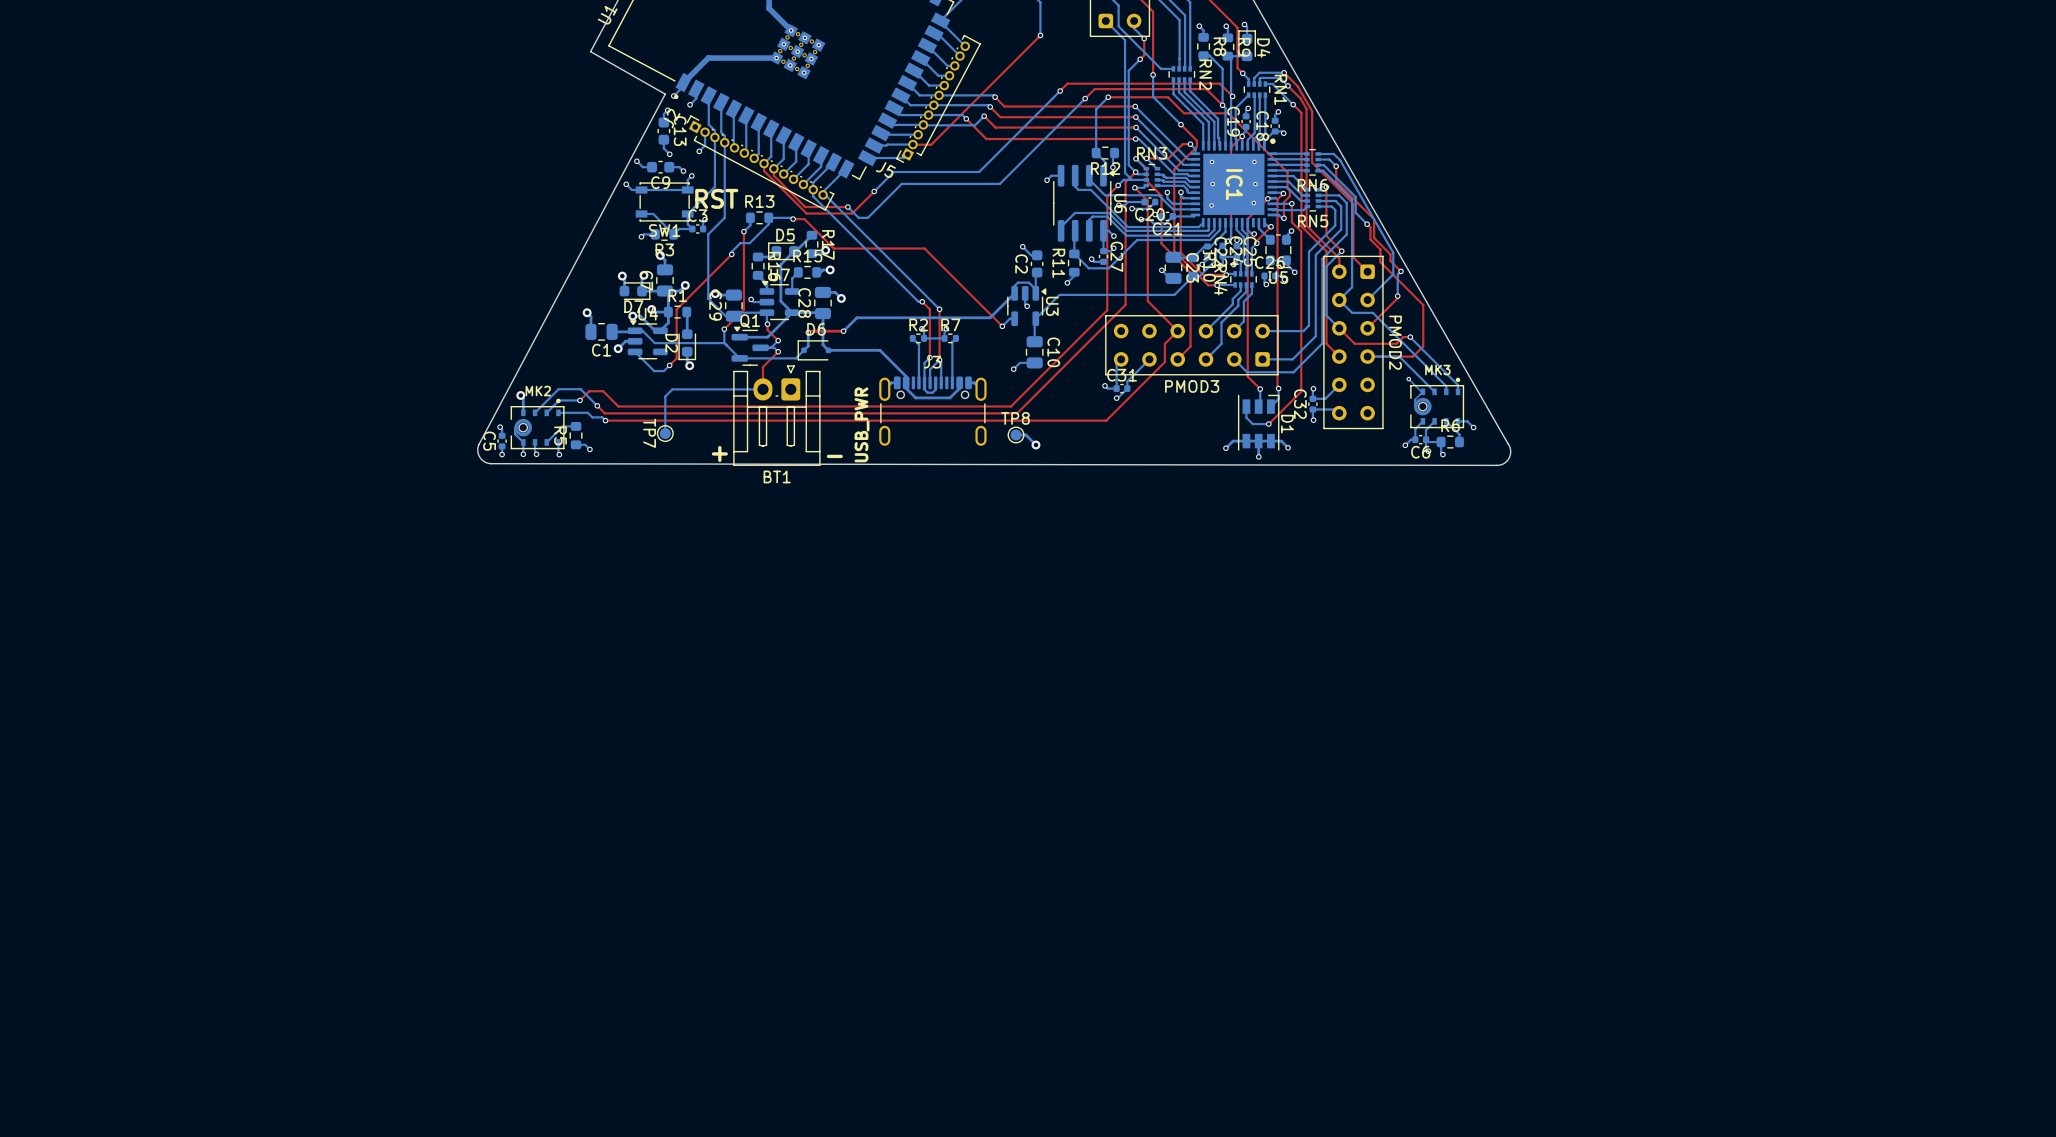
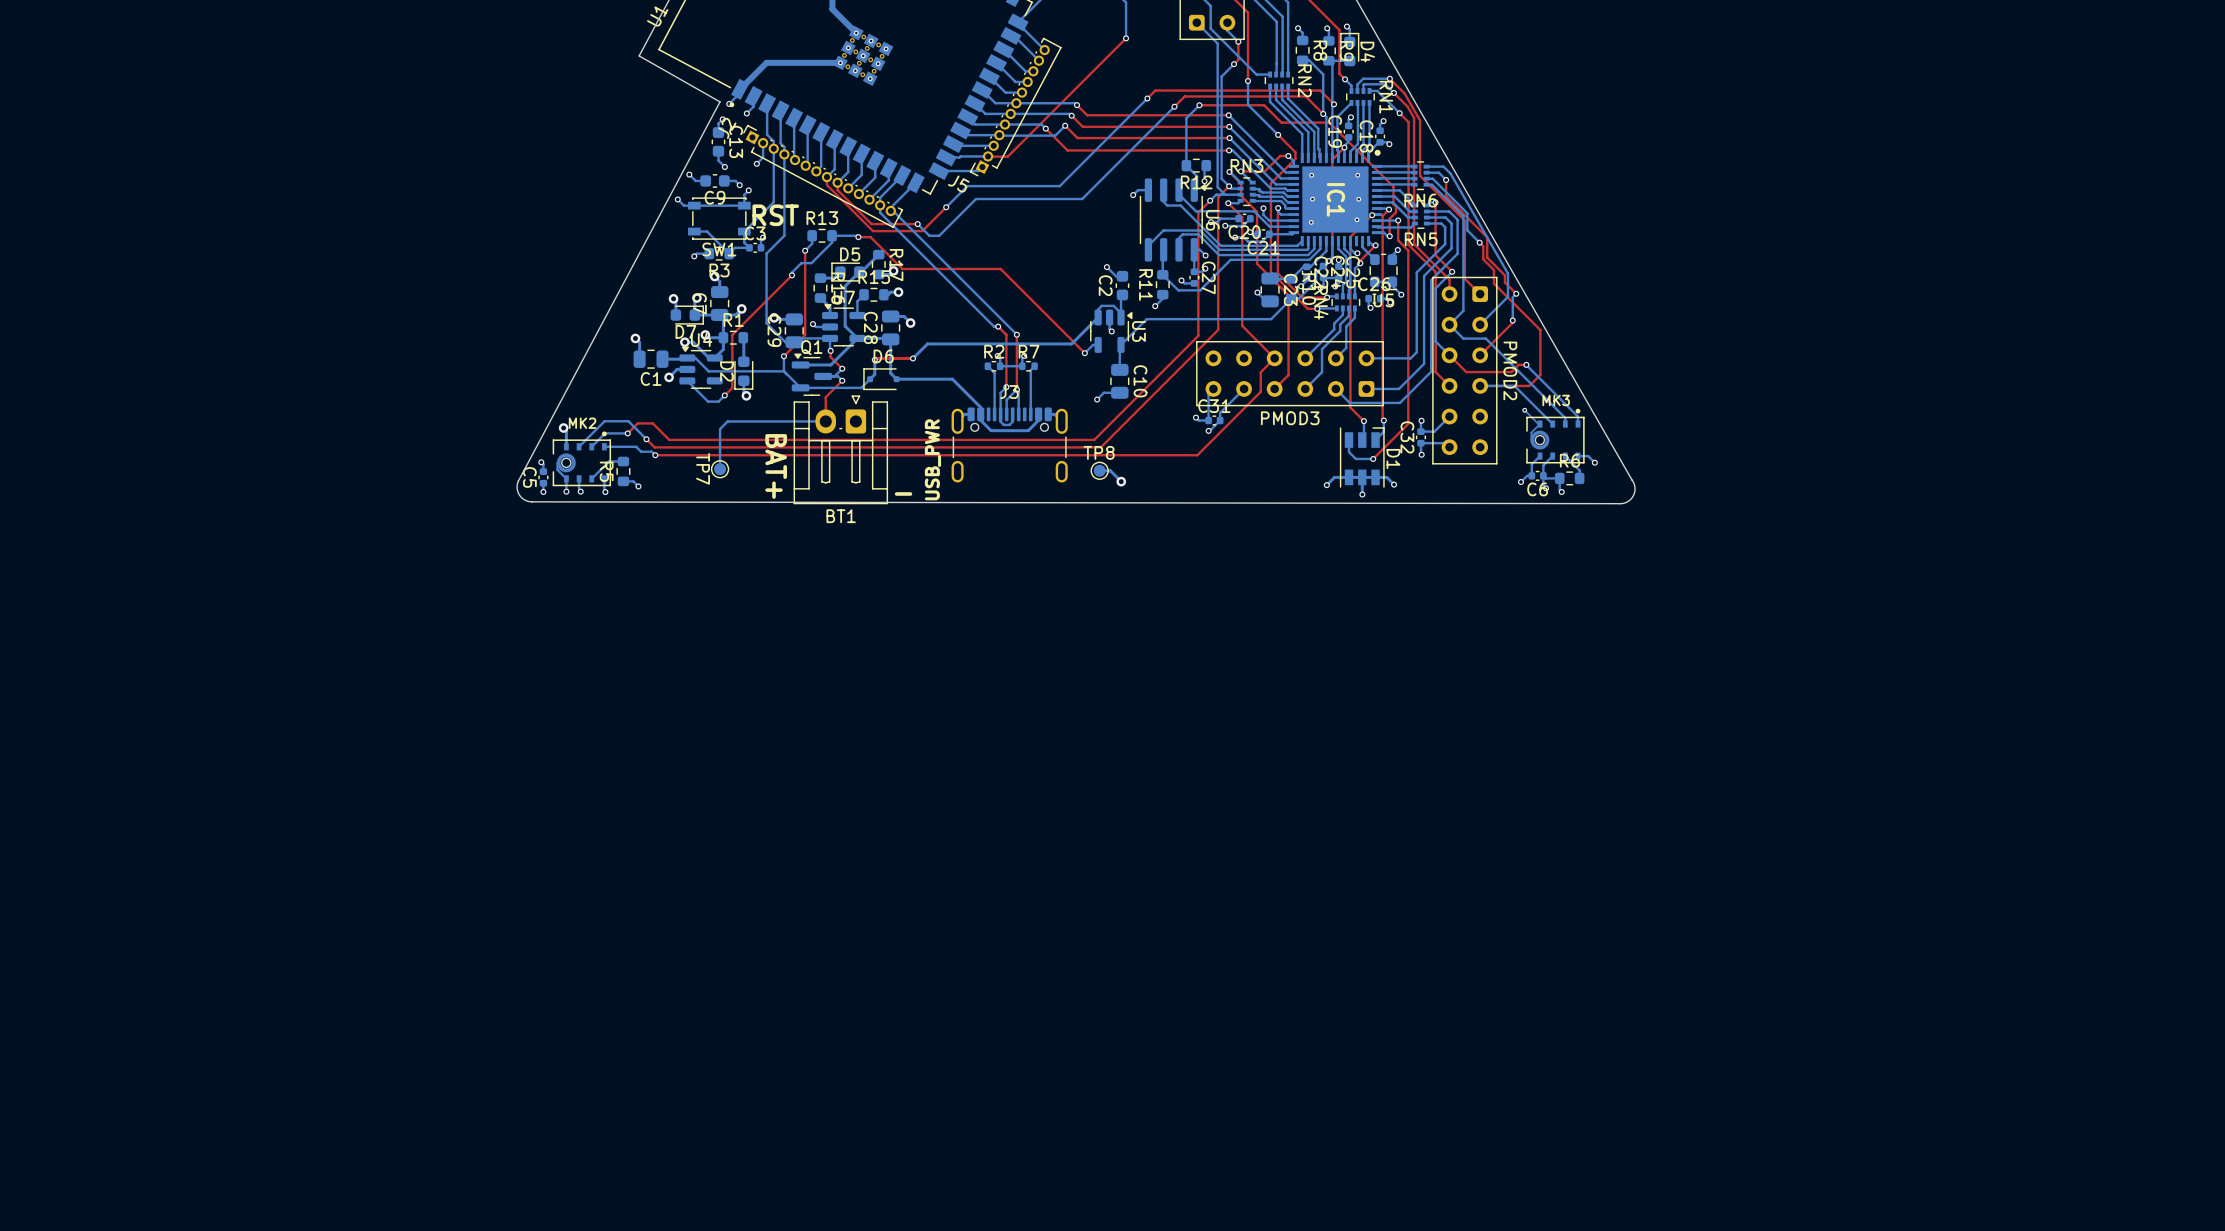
text: none -> BAT+ (776, 466)
text: + (719, 453) -> none

